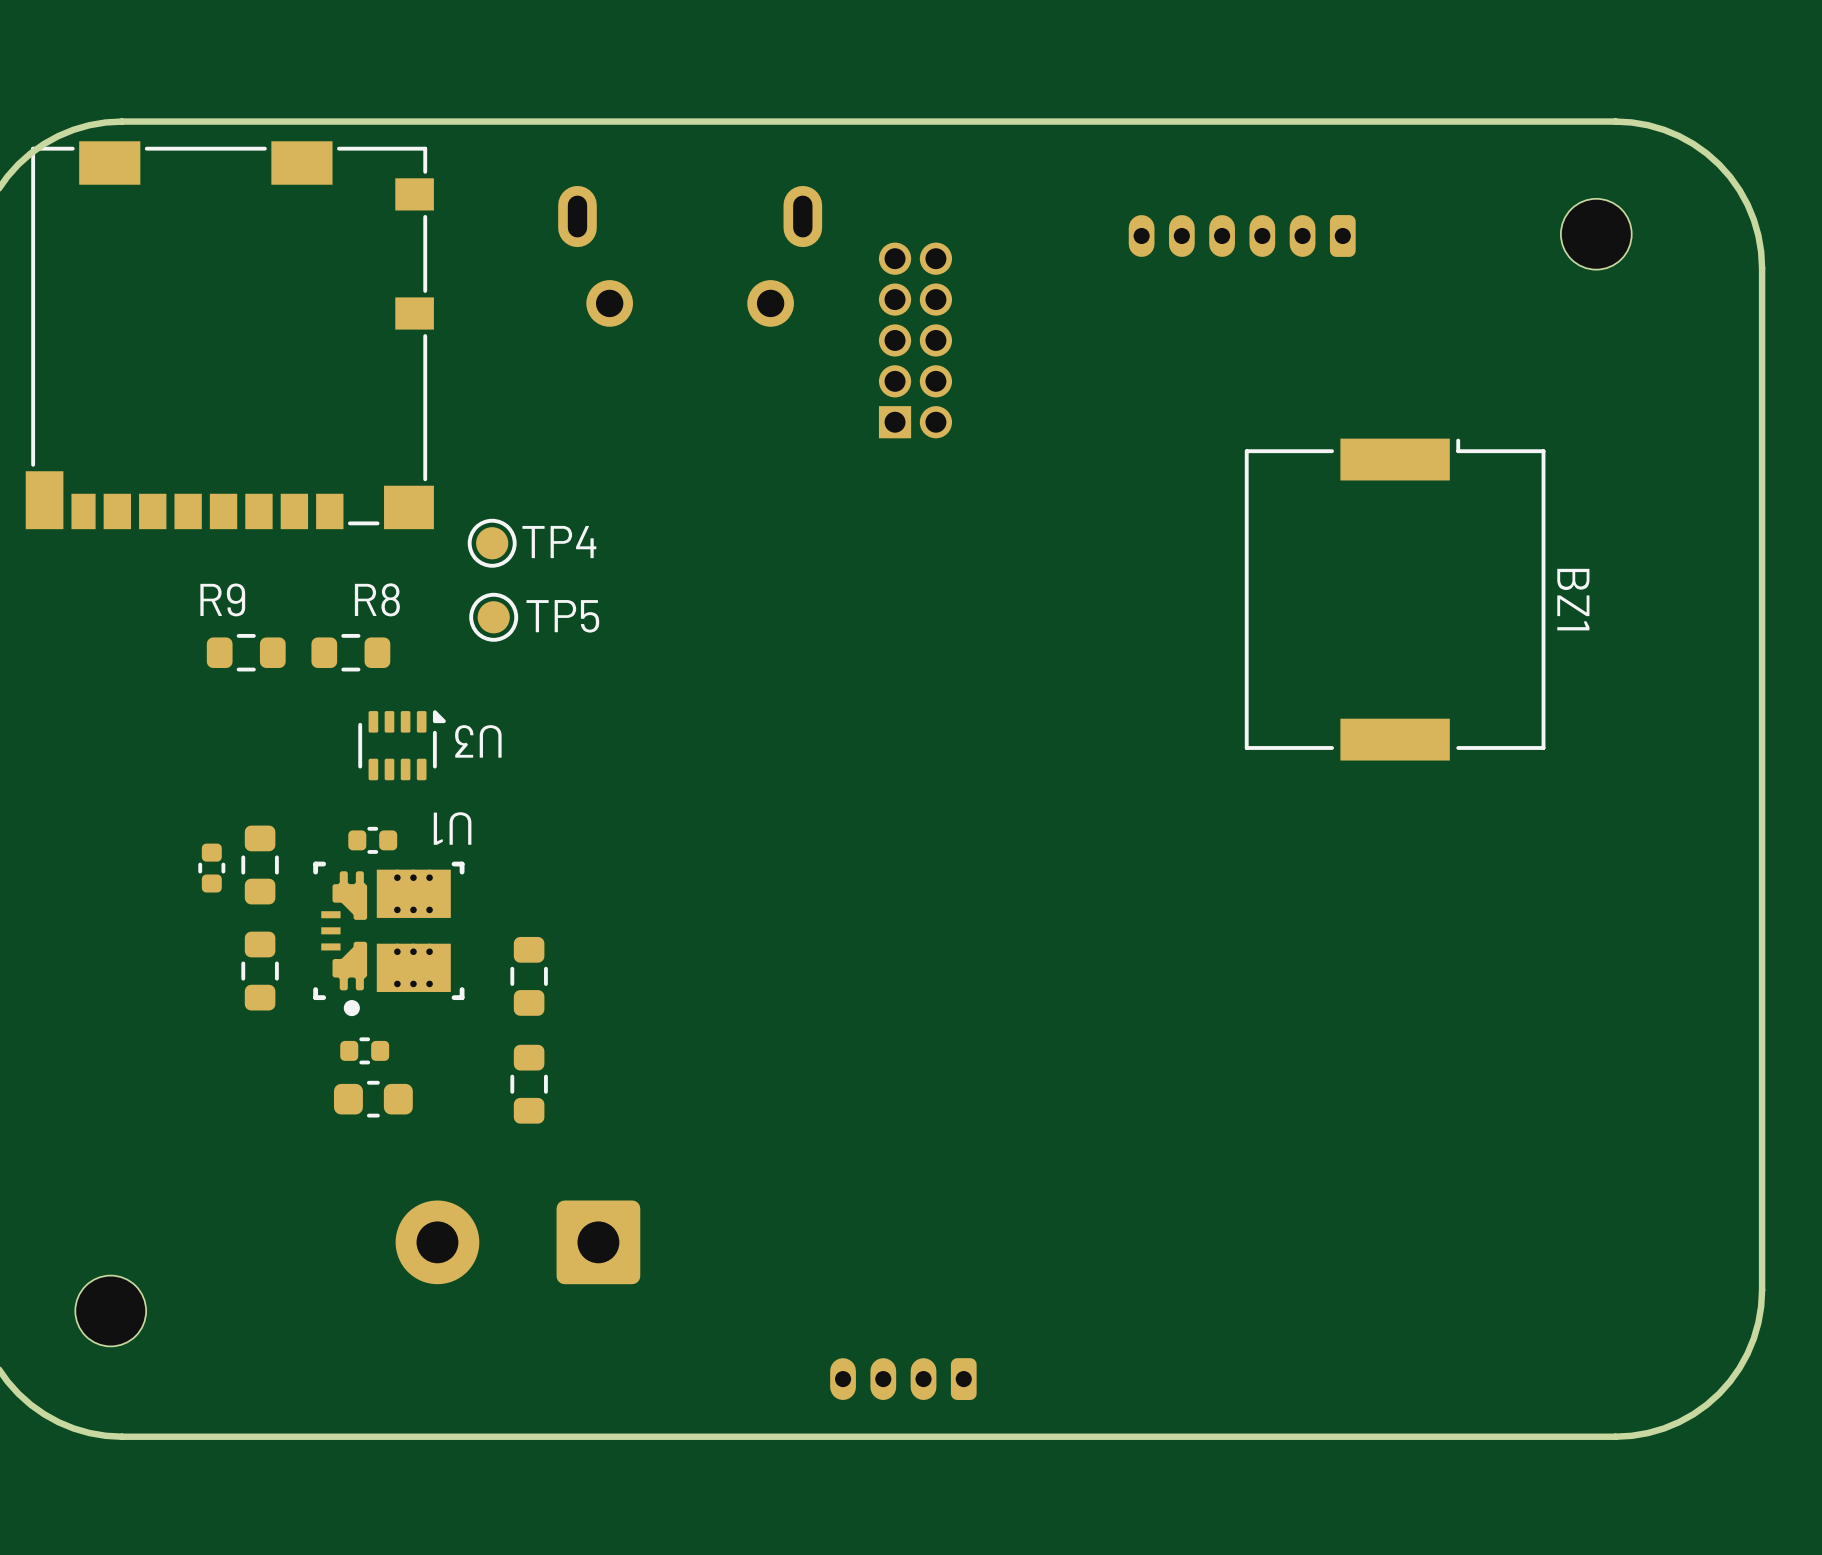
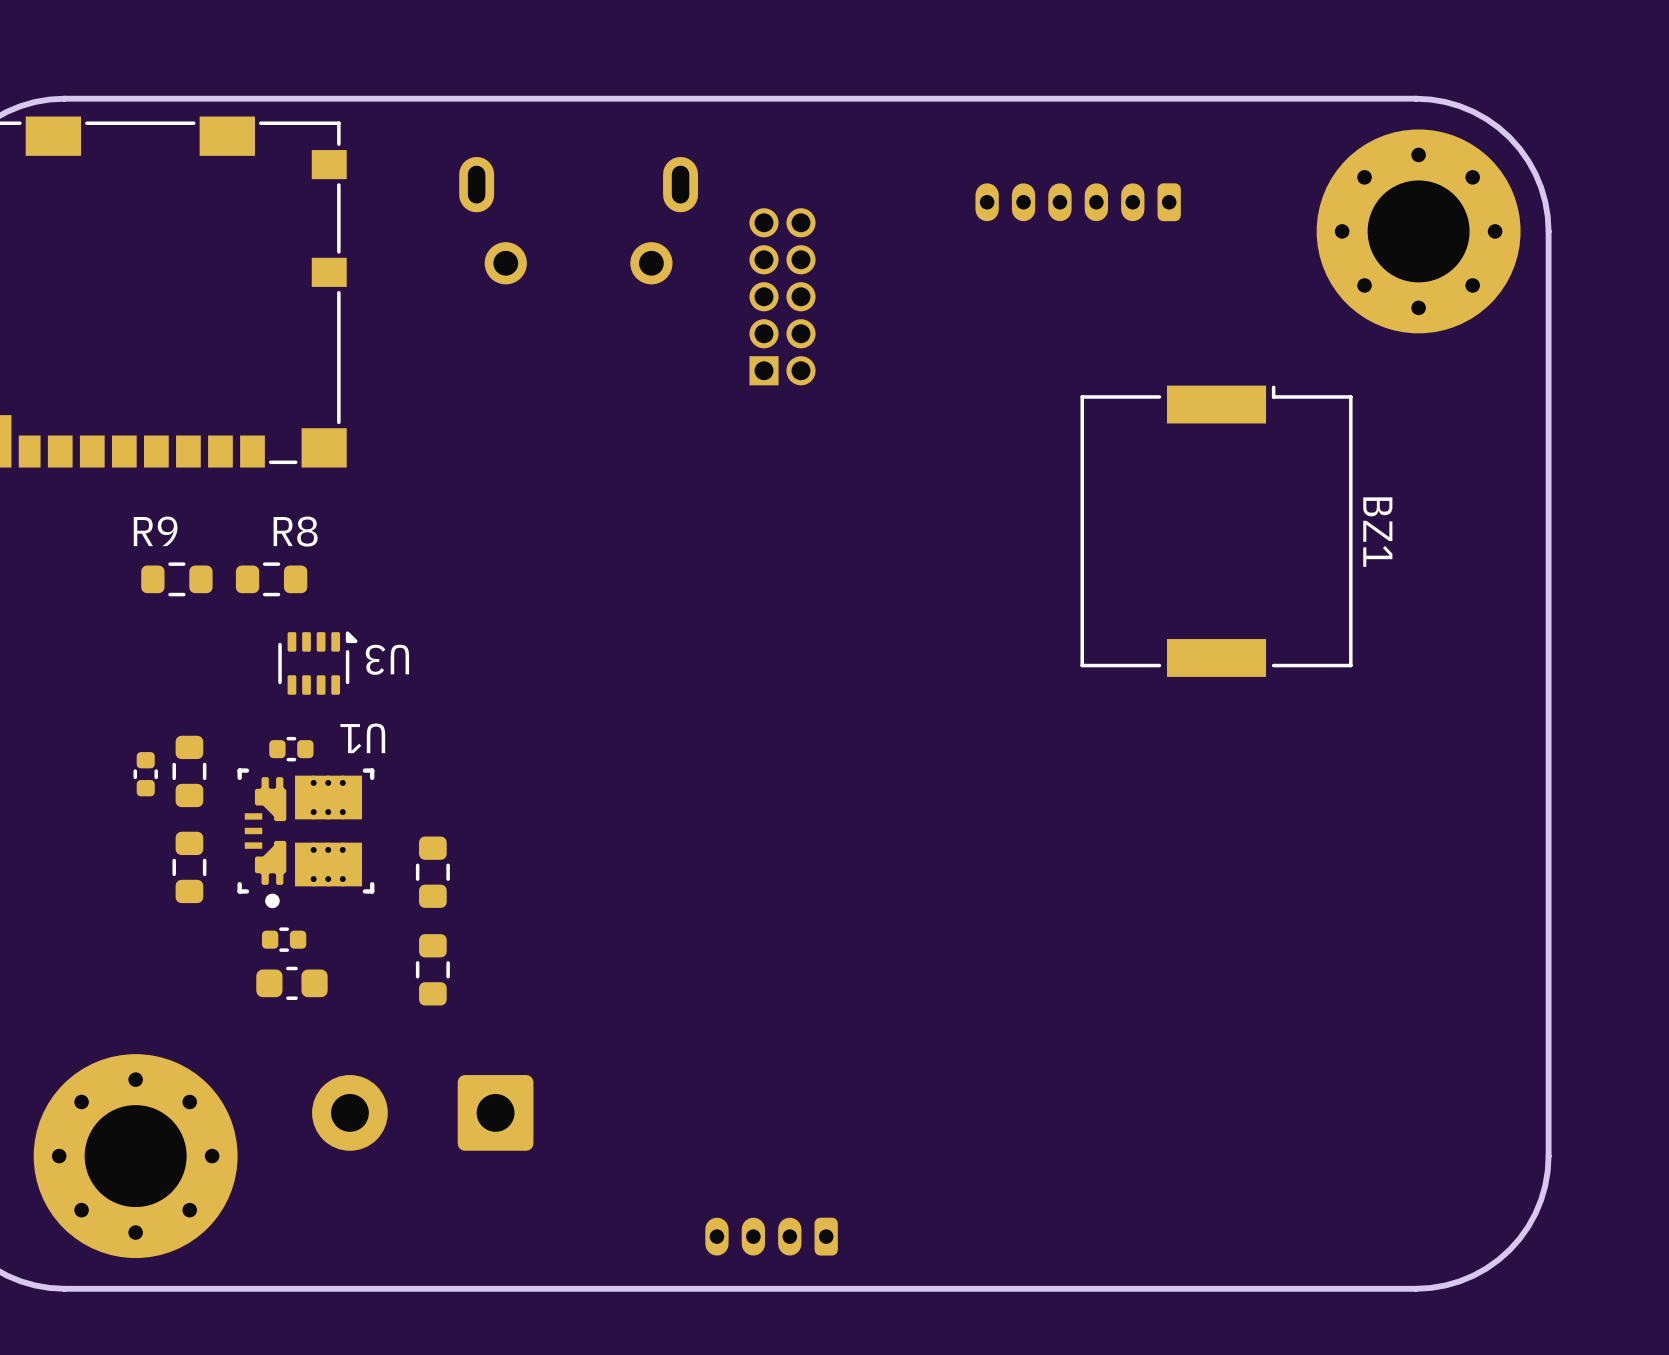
part: (1596, 234) -> none
part: none -> (1418, 231)
TP4: (492, 543) -> none
TP5: (493, 617) -> none
part: none -> (135, 1156)
part: (110, 1310) -> none

